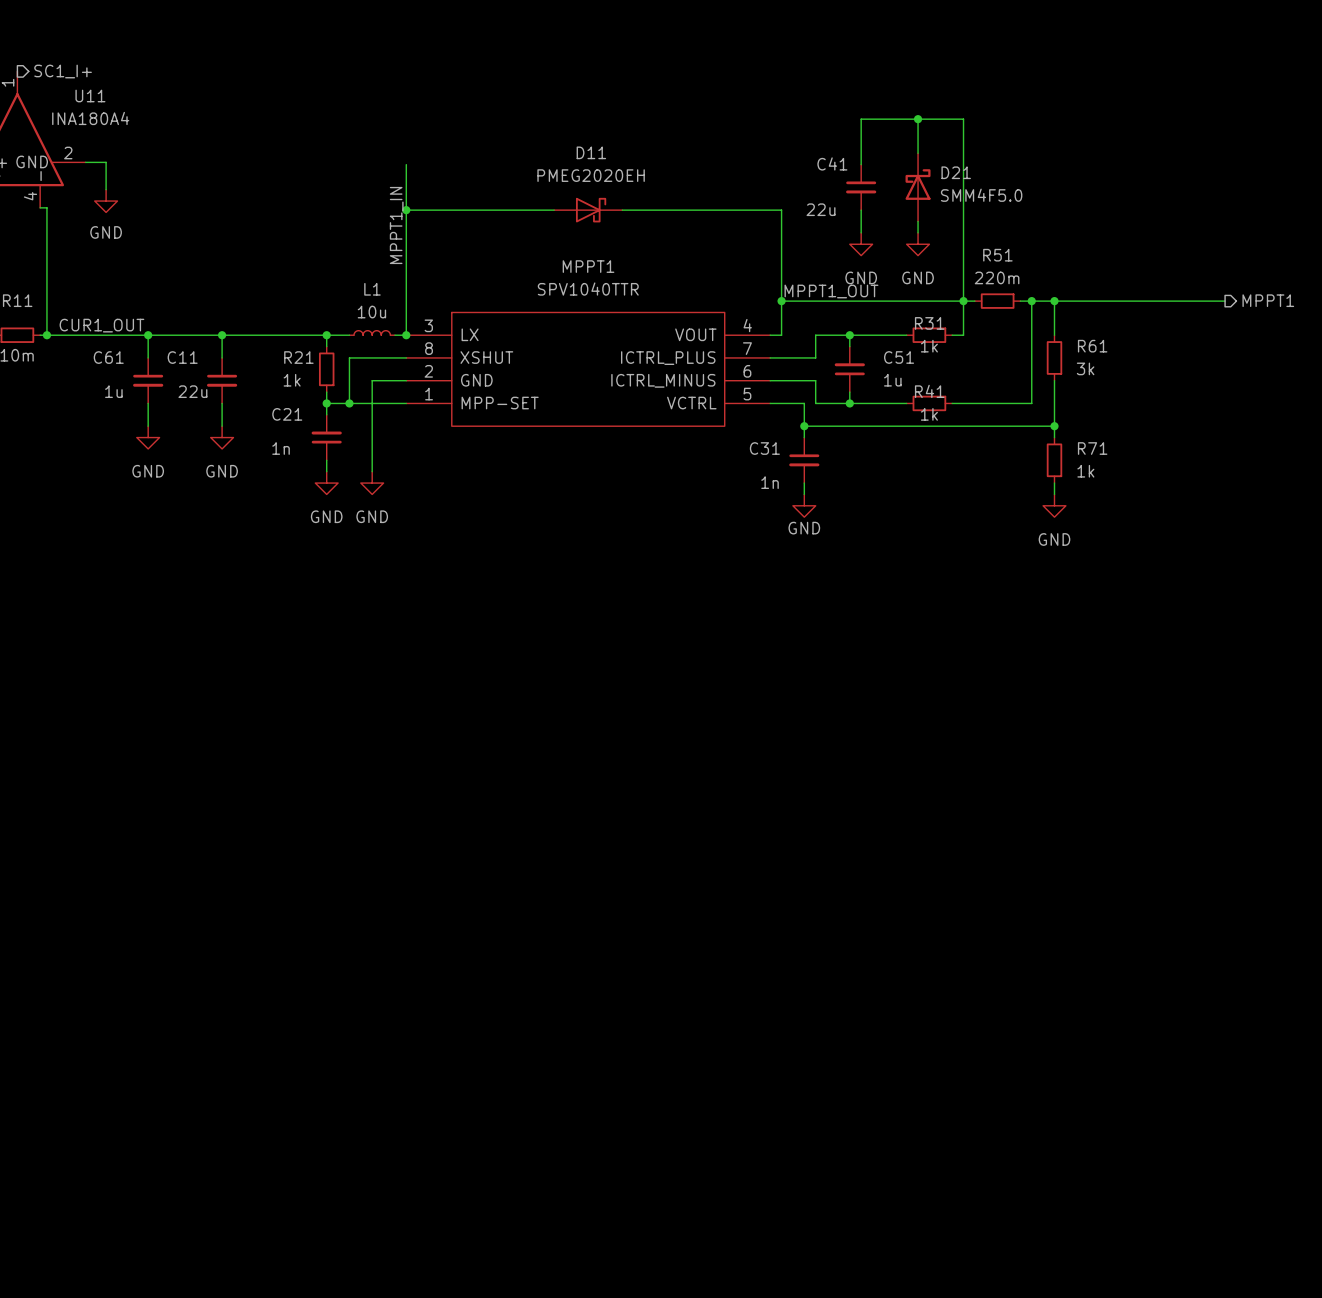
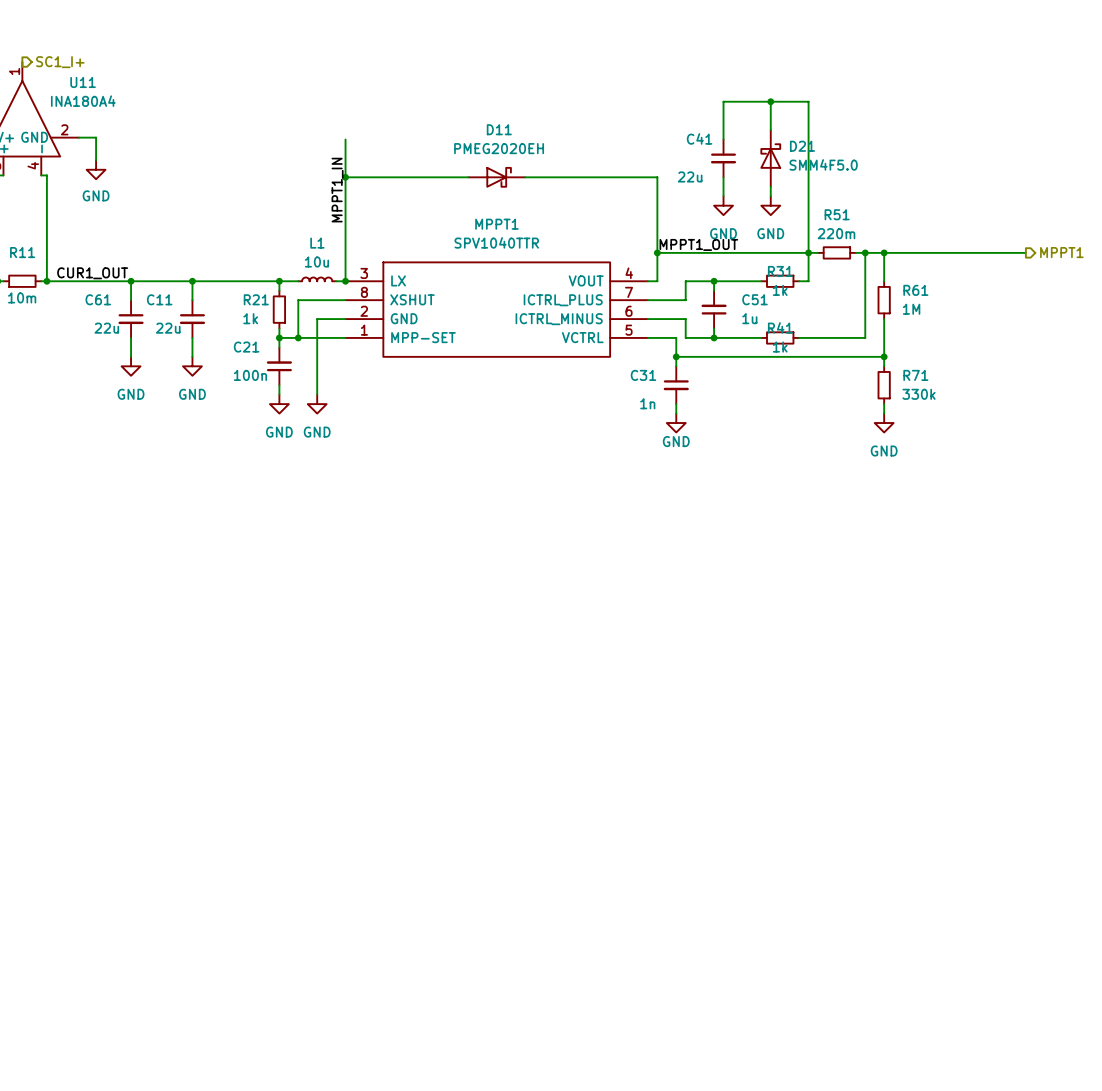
R61 value: 3k (1085, 368) -> 1M (911, 309)
C61 value: 1u (113, 391) -> 22u (106, 328)
C21 value: 1n (281, 448) -> 100n (250, 375)
R71 value: 1k (1085, 471) -> 330k (919, 394)

